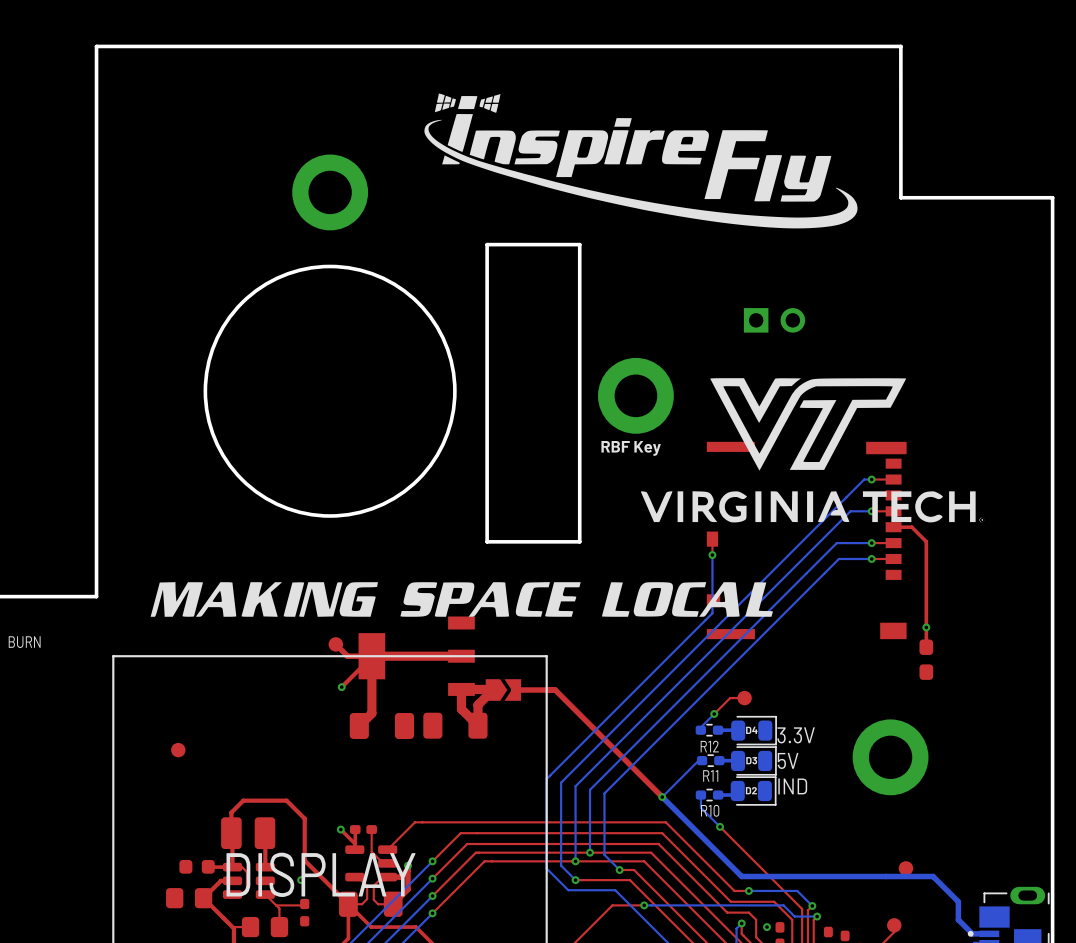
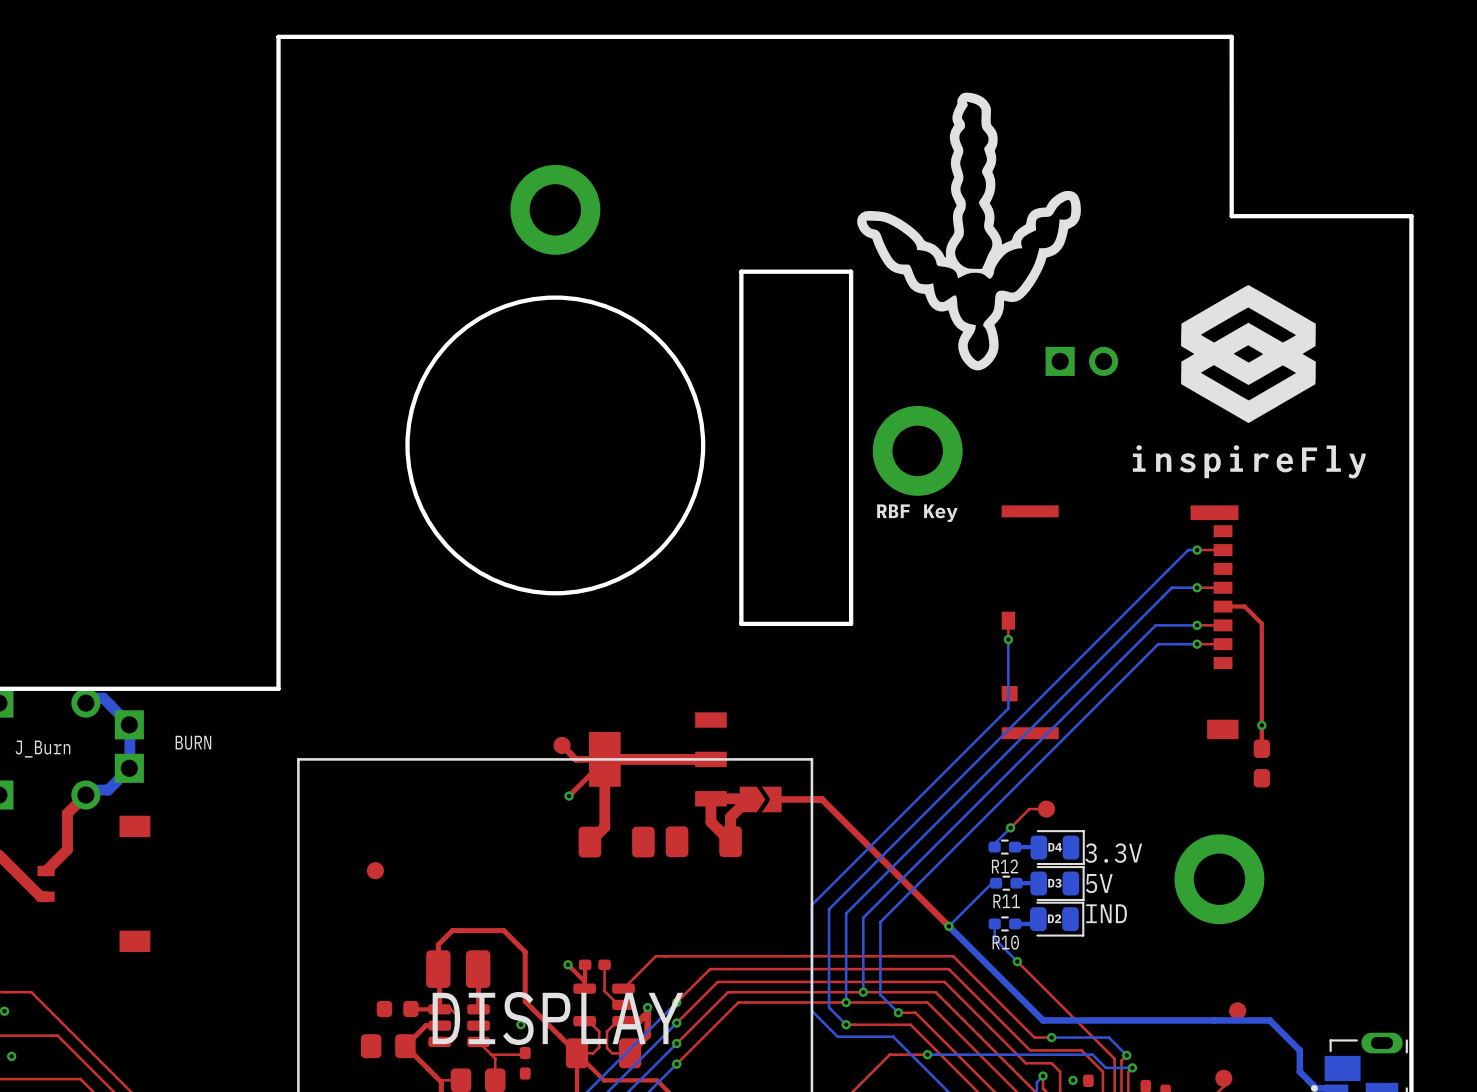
drawing: [424, 93, 858, 229] -> none
drawing: none -> [857, 92, 1081, 371]
drawing: none -> [1132, 285, 1366, 479]
drawing: [640, 378, 985, 523] -> none
drawing: [150, 582, 773, 617] -> none

